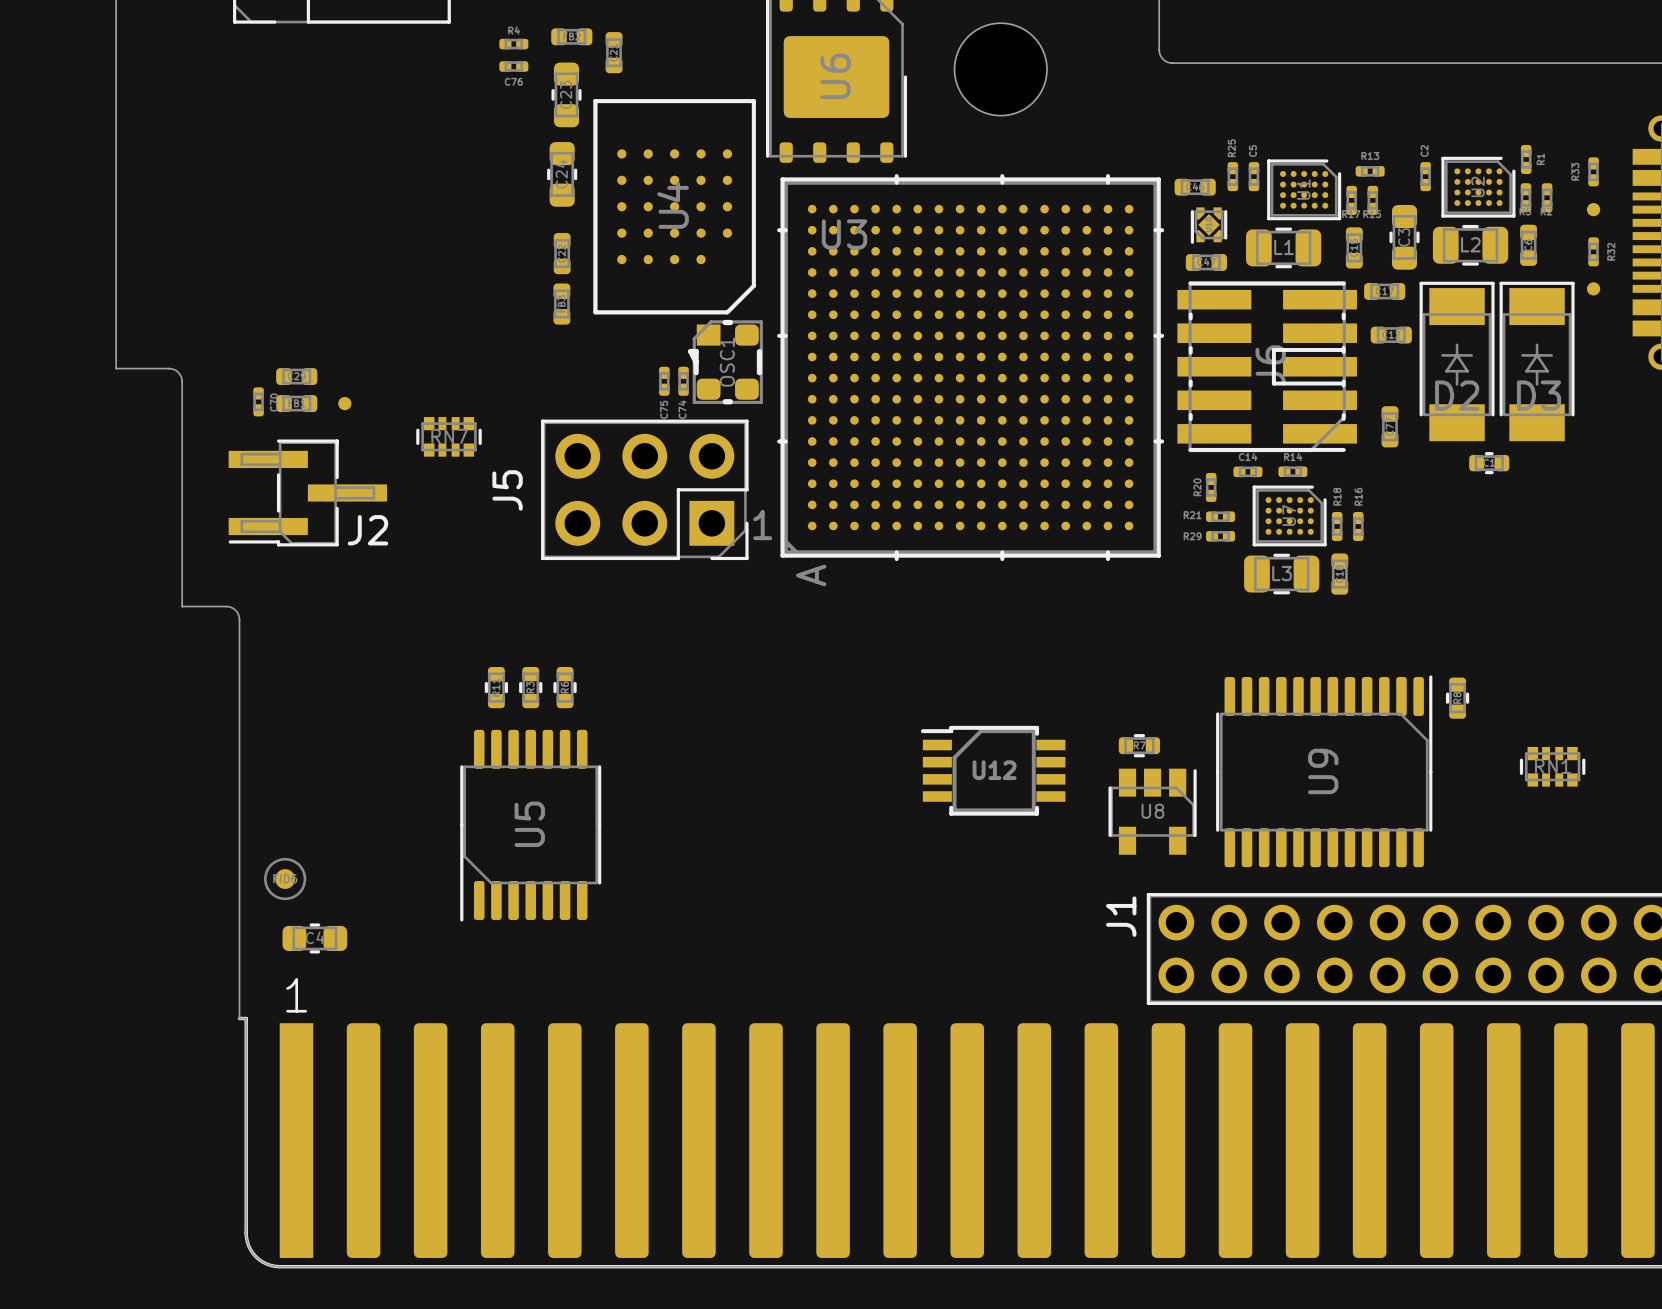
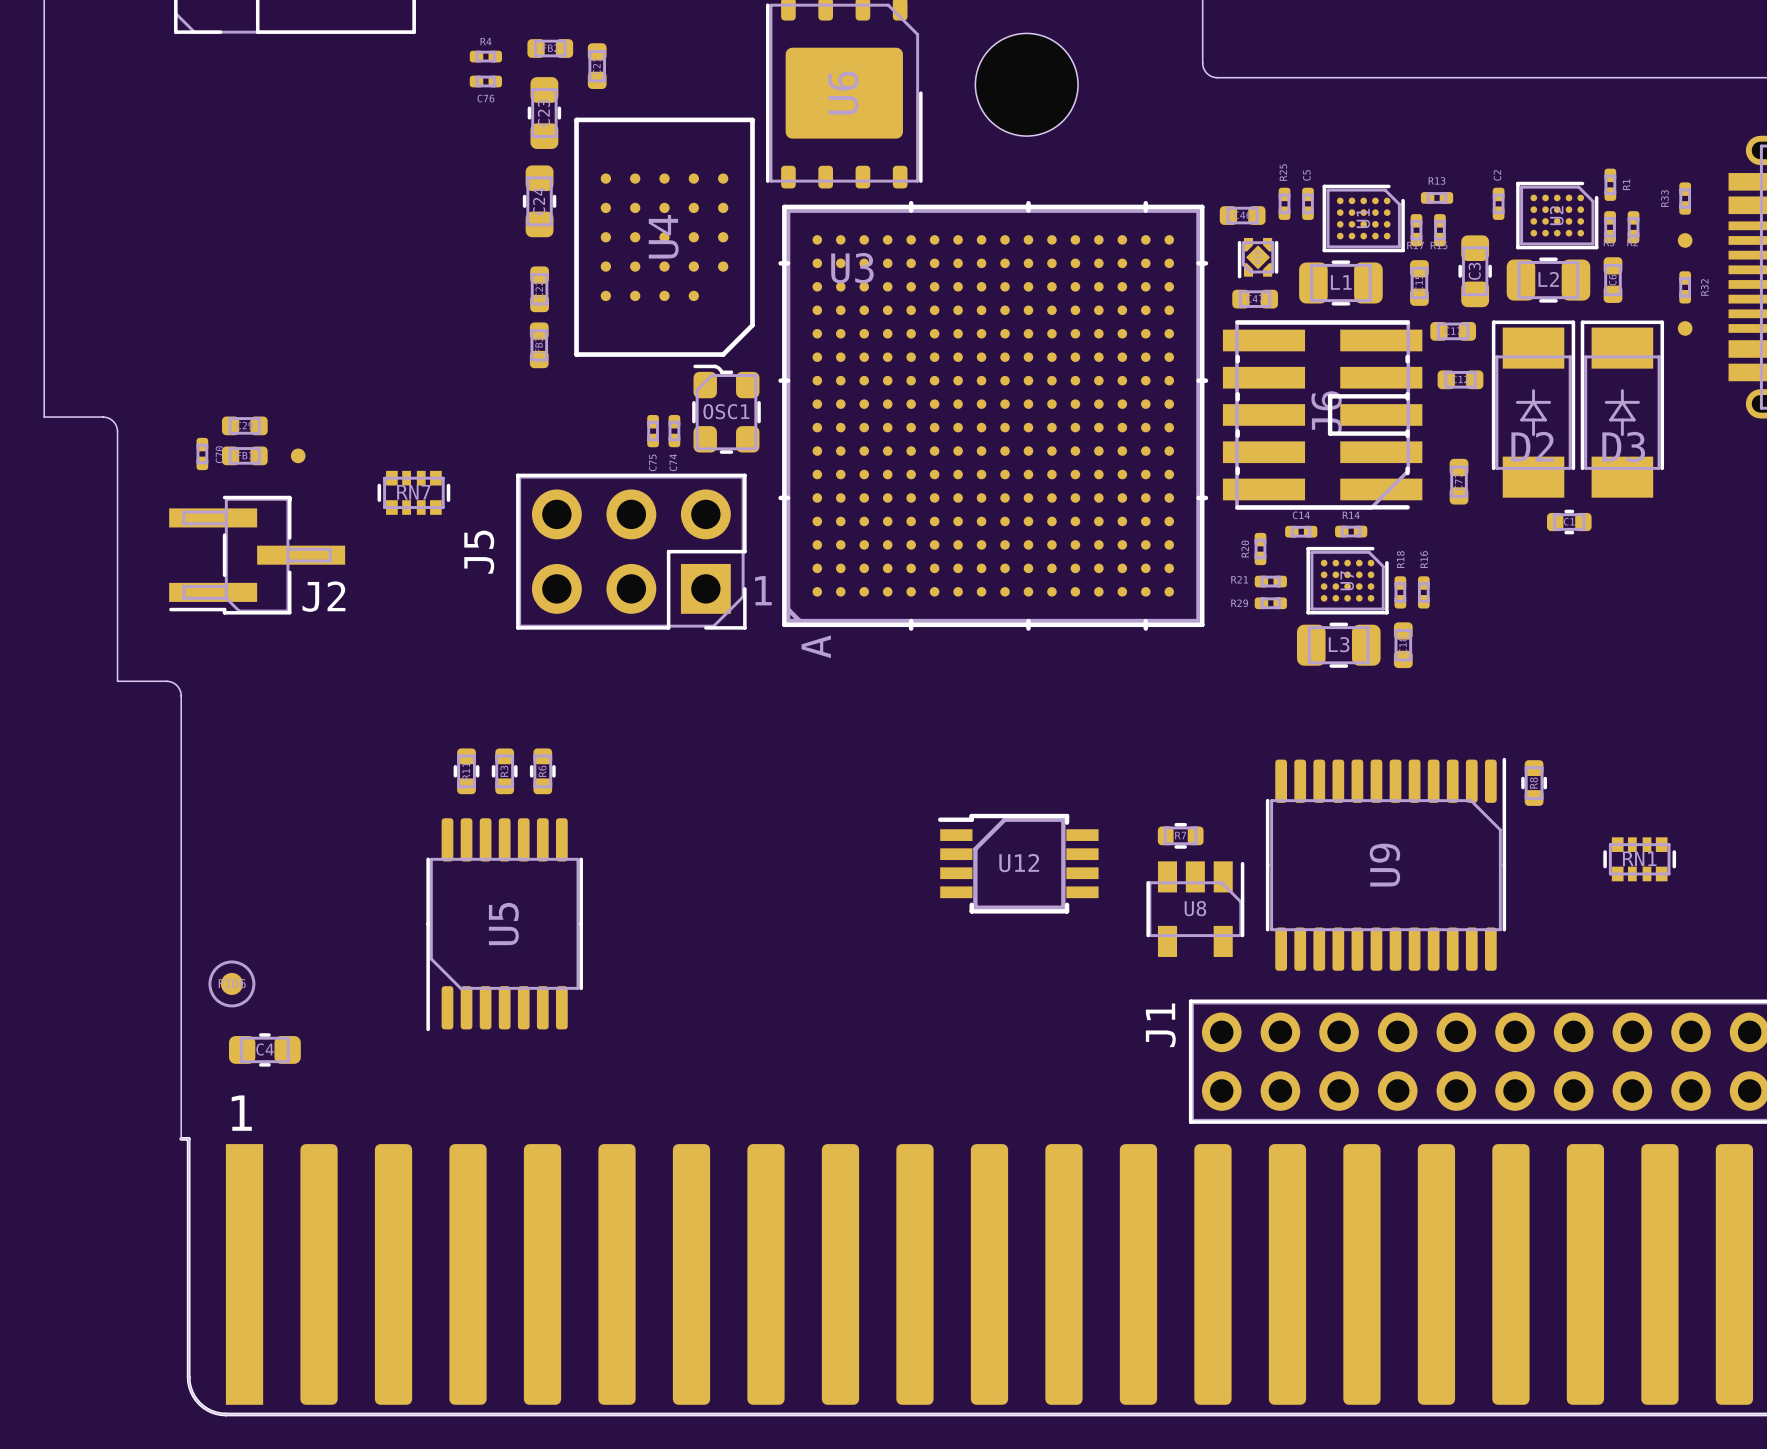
OSC1 footprint: [688, 319, 763, 405] -> [692, 364, 761, 454]
OSC1 name rotation: 0° (727, 362) -> 90° clockwise (726, 411)

